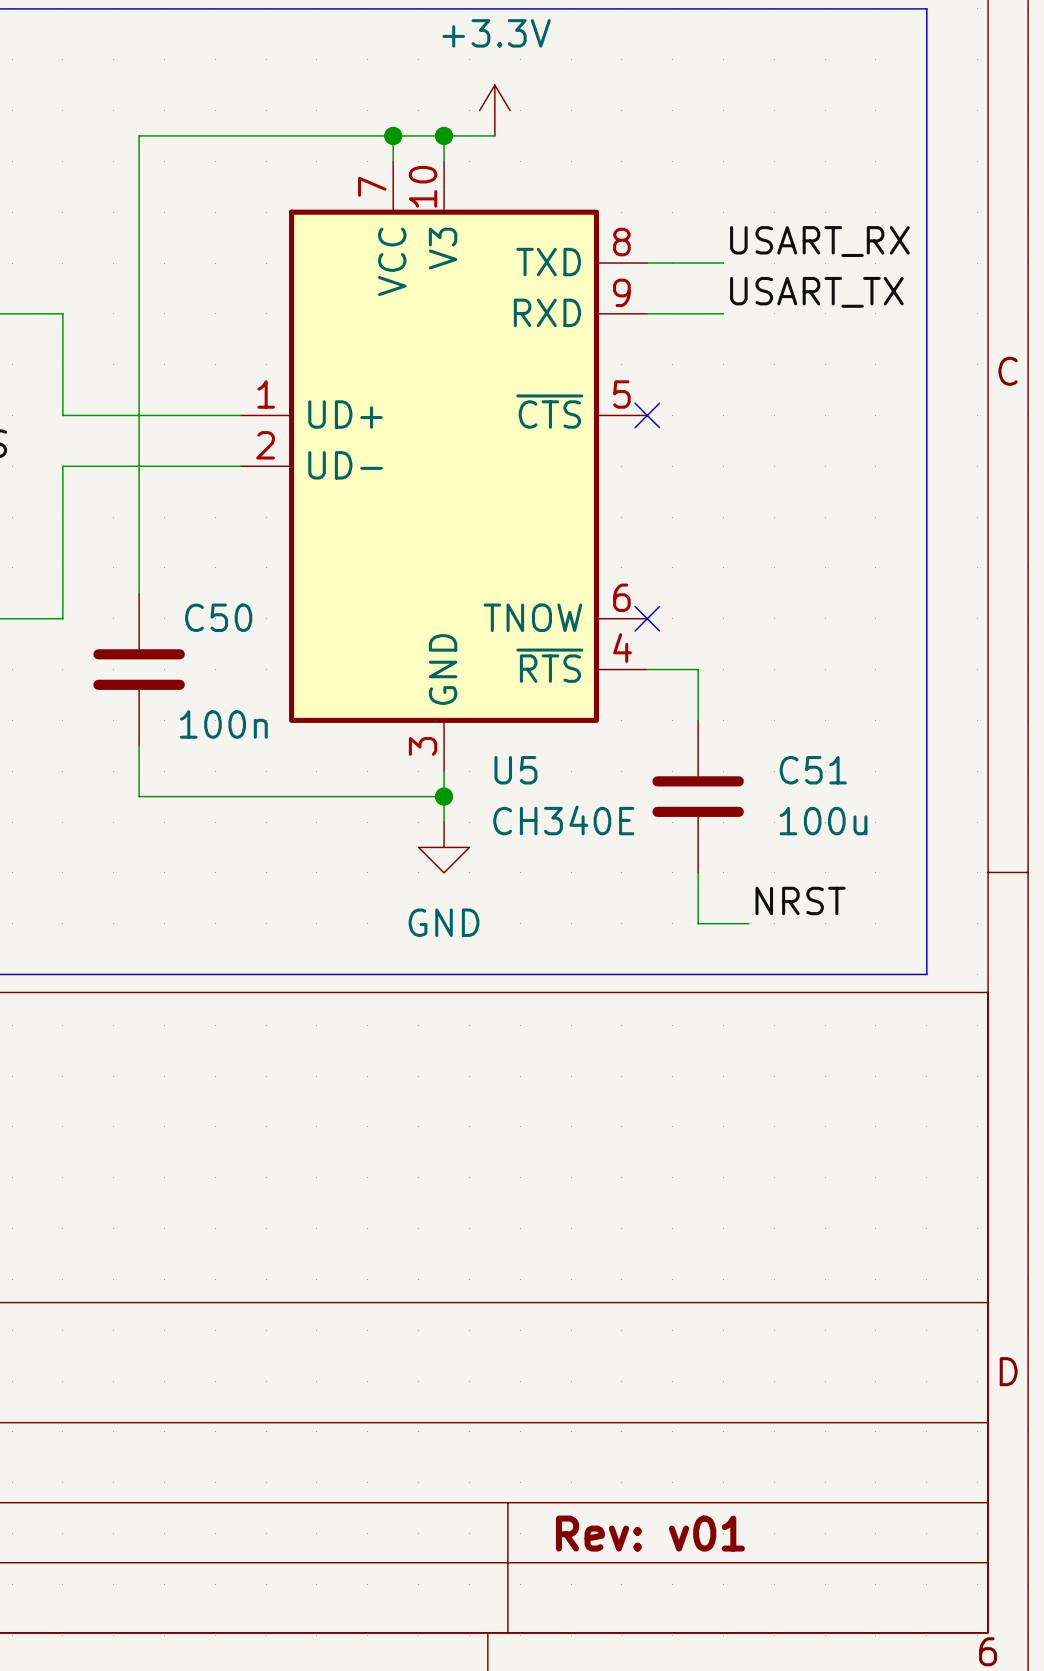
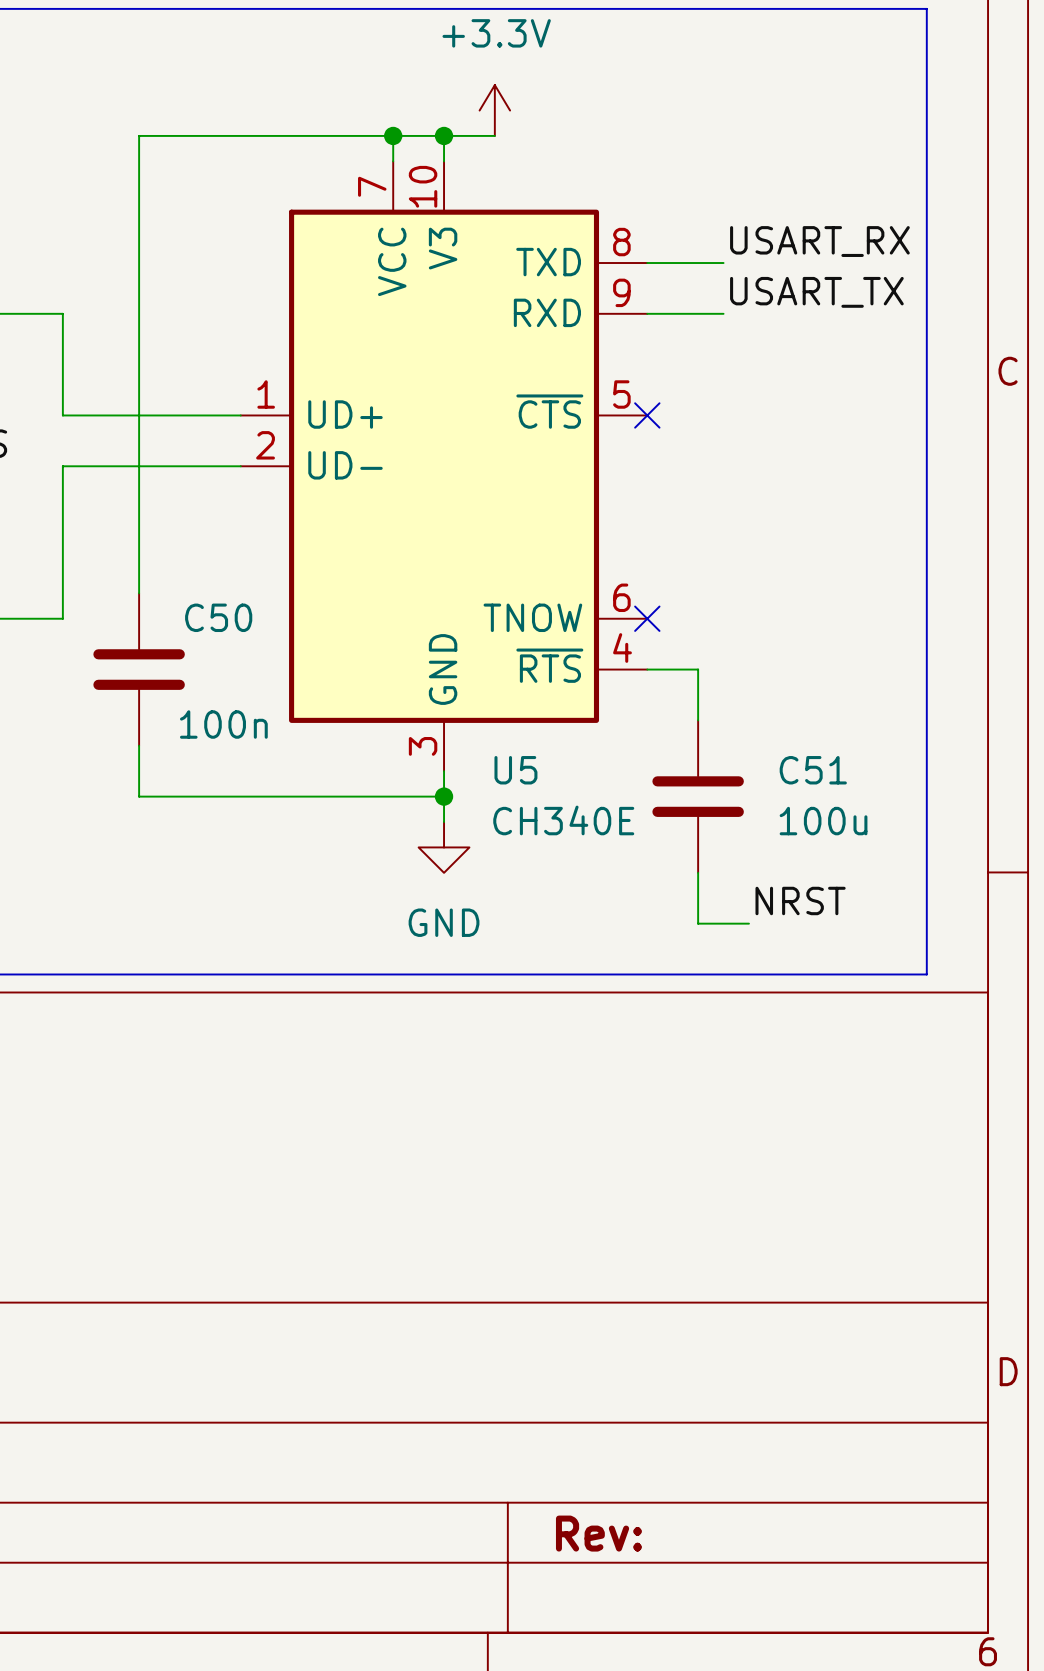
title block: Rev: v01 (650, 1533) -> Rev: (598, 1533)

